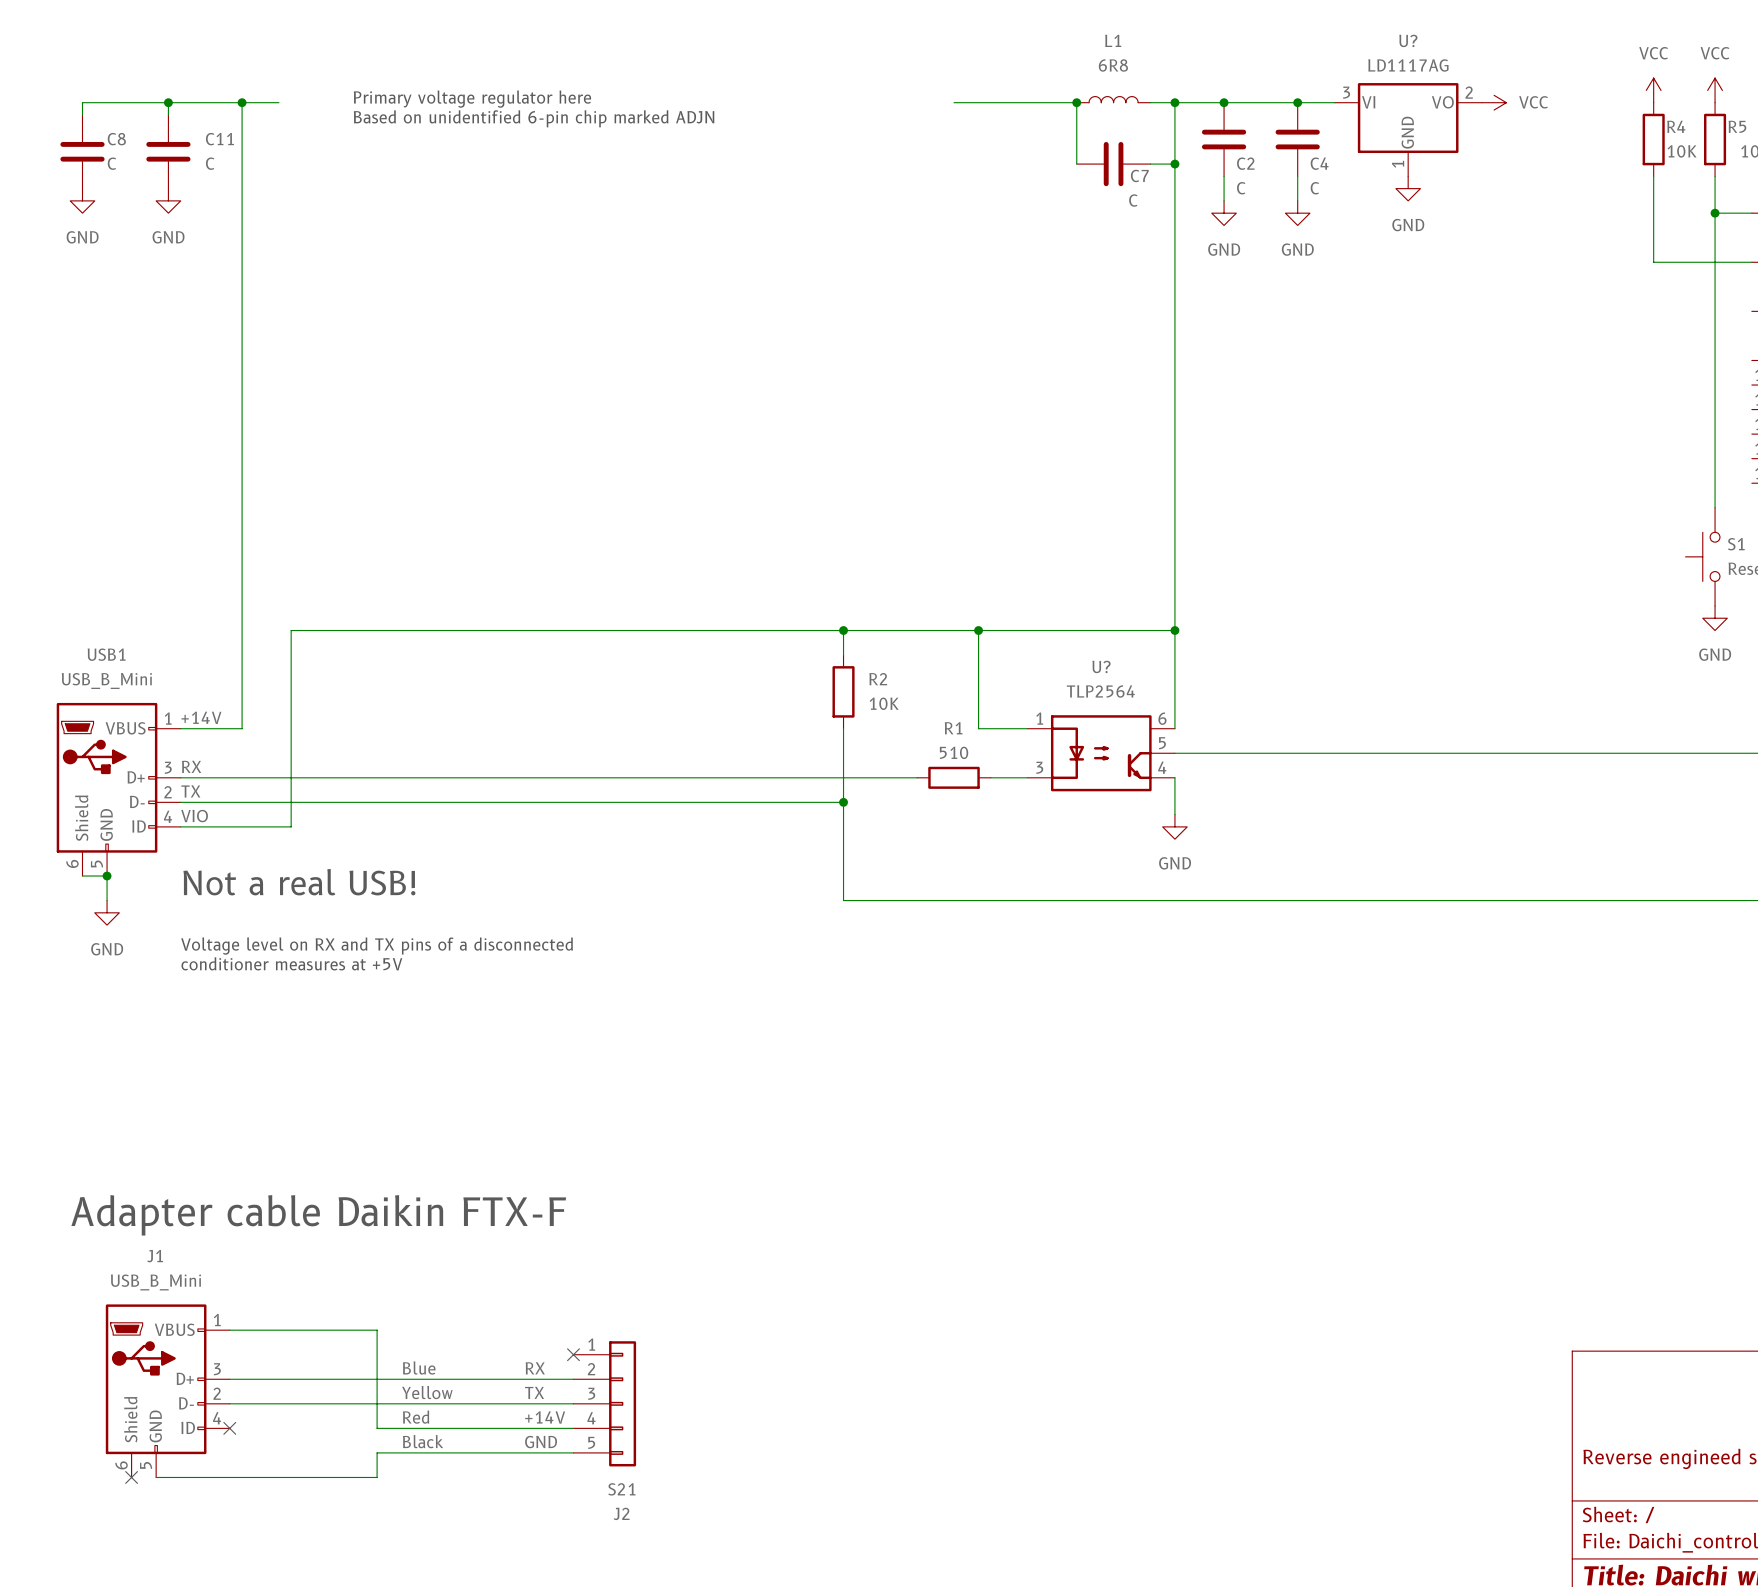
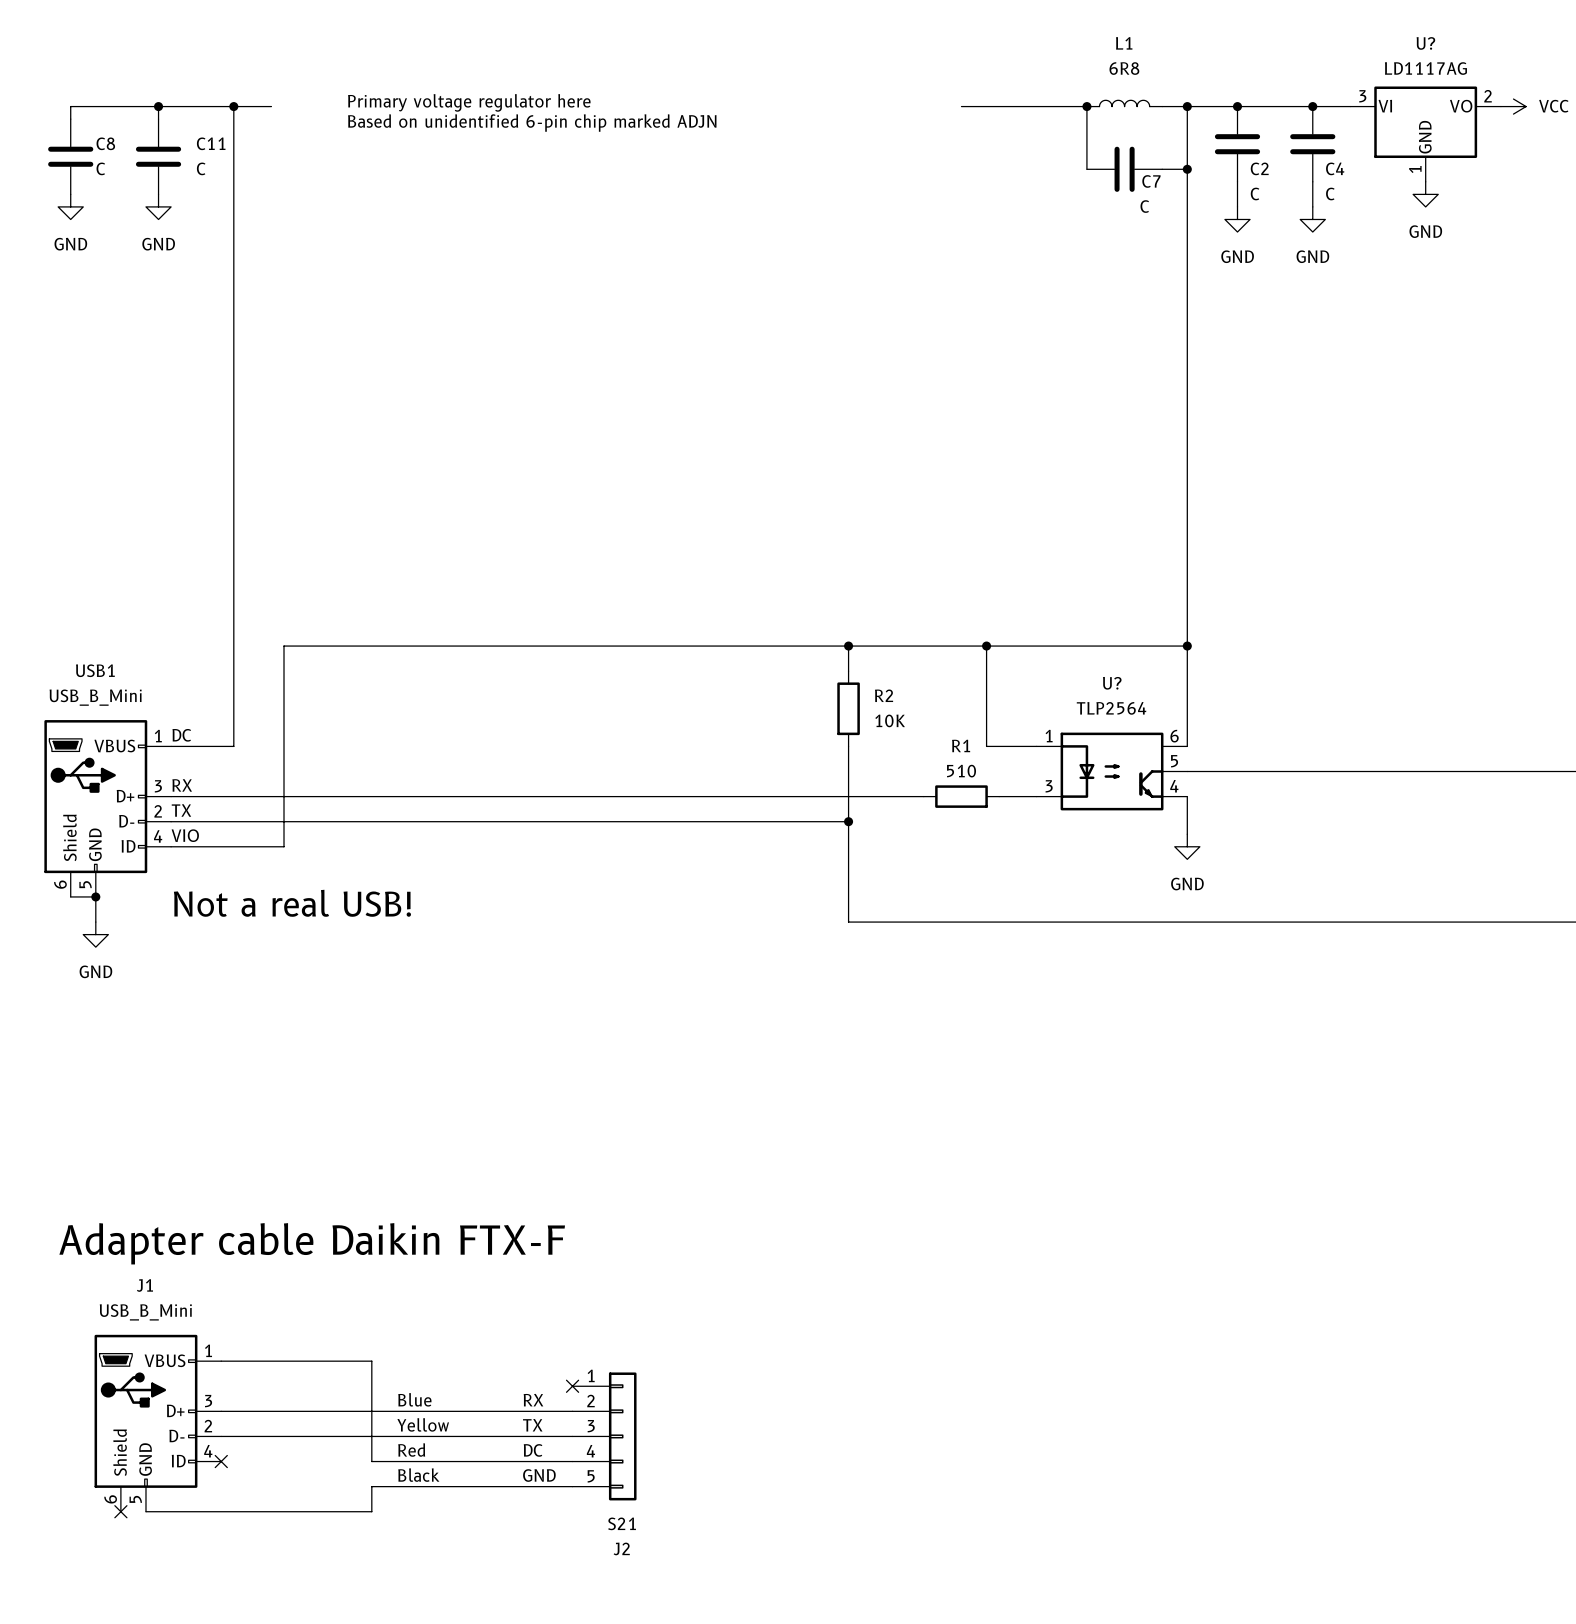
label: +14V (201, 717) -> DC (181, 735)
text: Voltage level on RX and TX pins of a disconnected (377, 946) -> none
text: conditioner measures at +5V (291, 963) -> none
label: +14V (545, 1417) -> DC (533, 1450)

